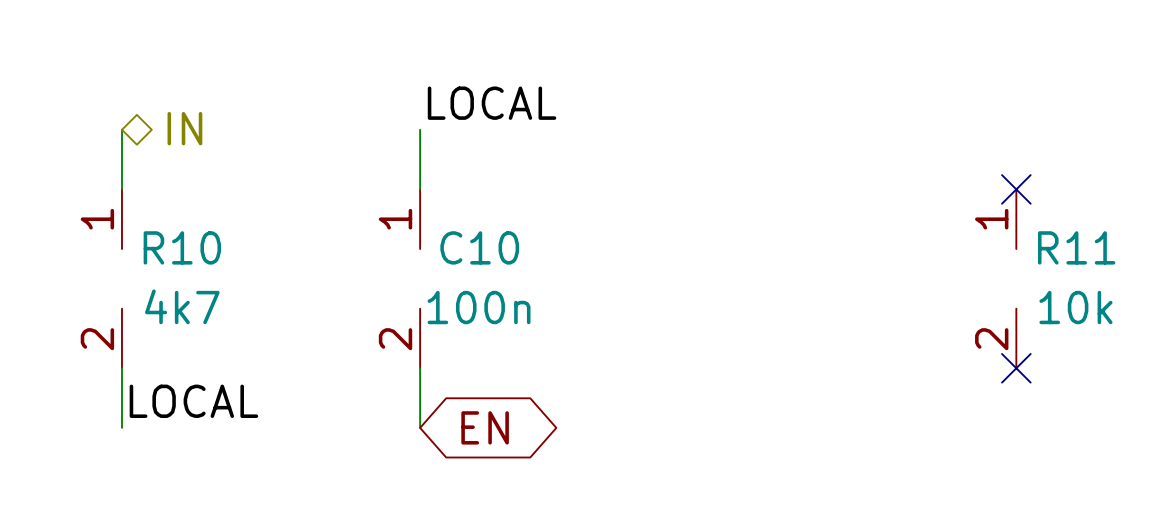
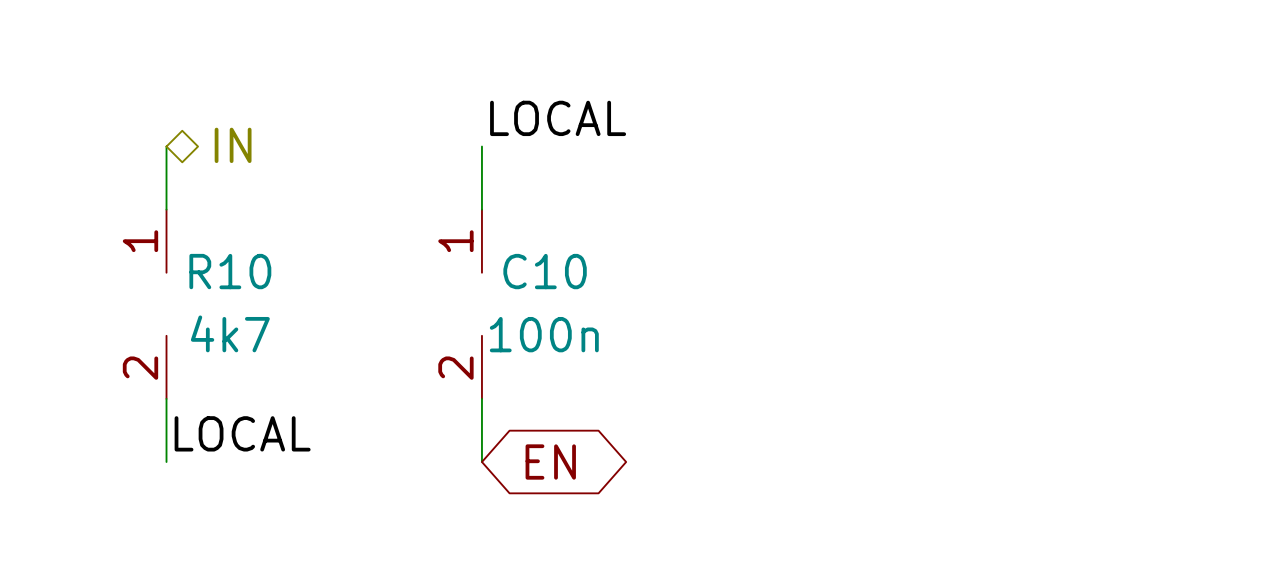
no-connect mark: (1016, 189) -> none
R11: 10k (1016, 278) -> none
no-connect mark: (1016, 368) -> none

